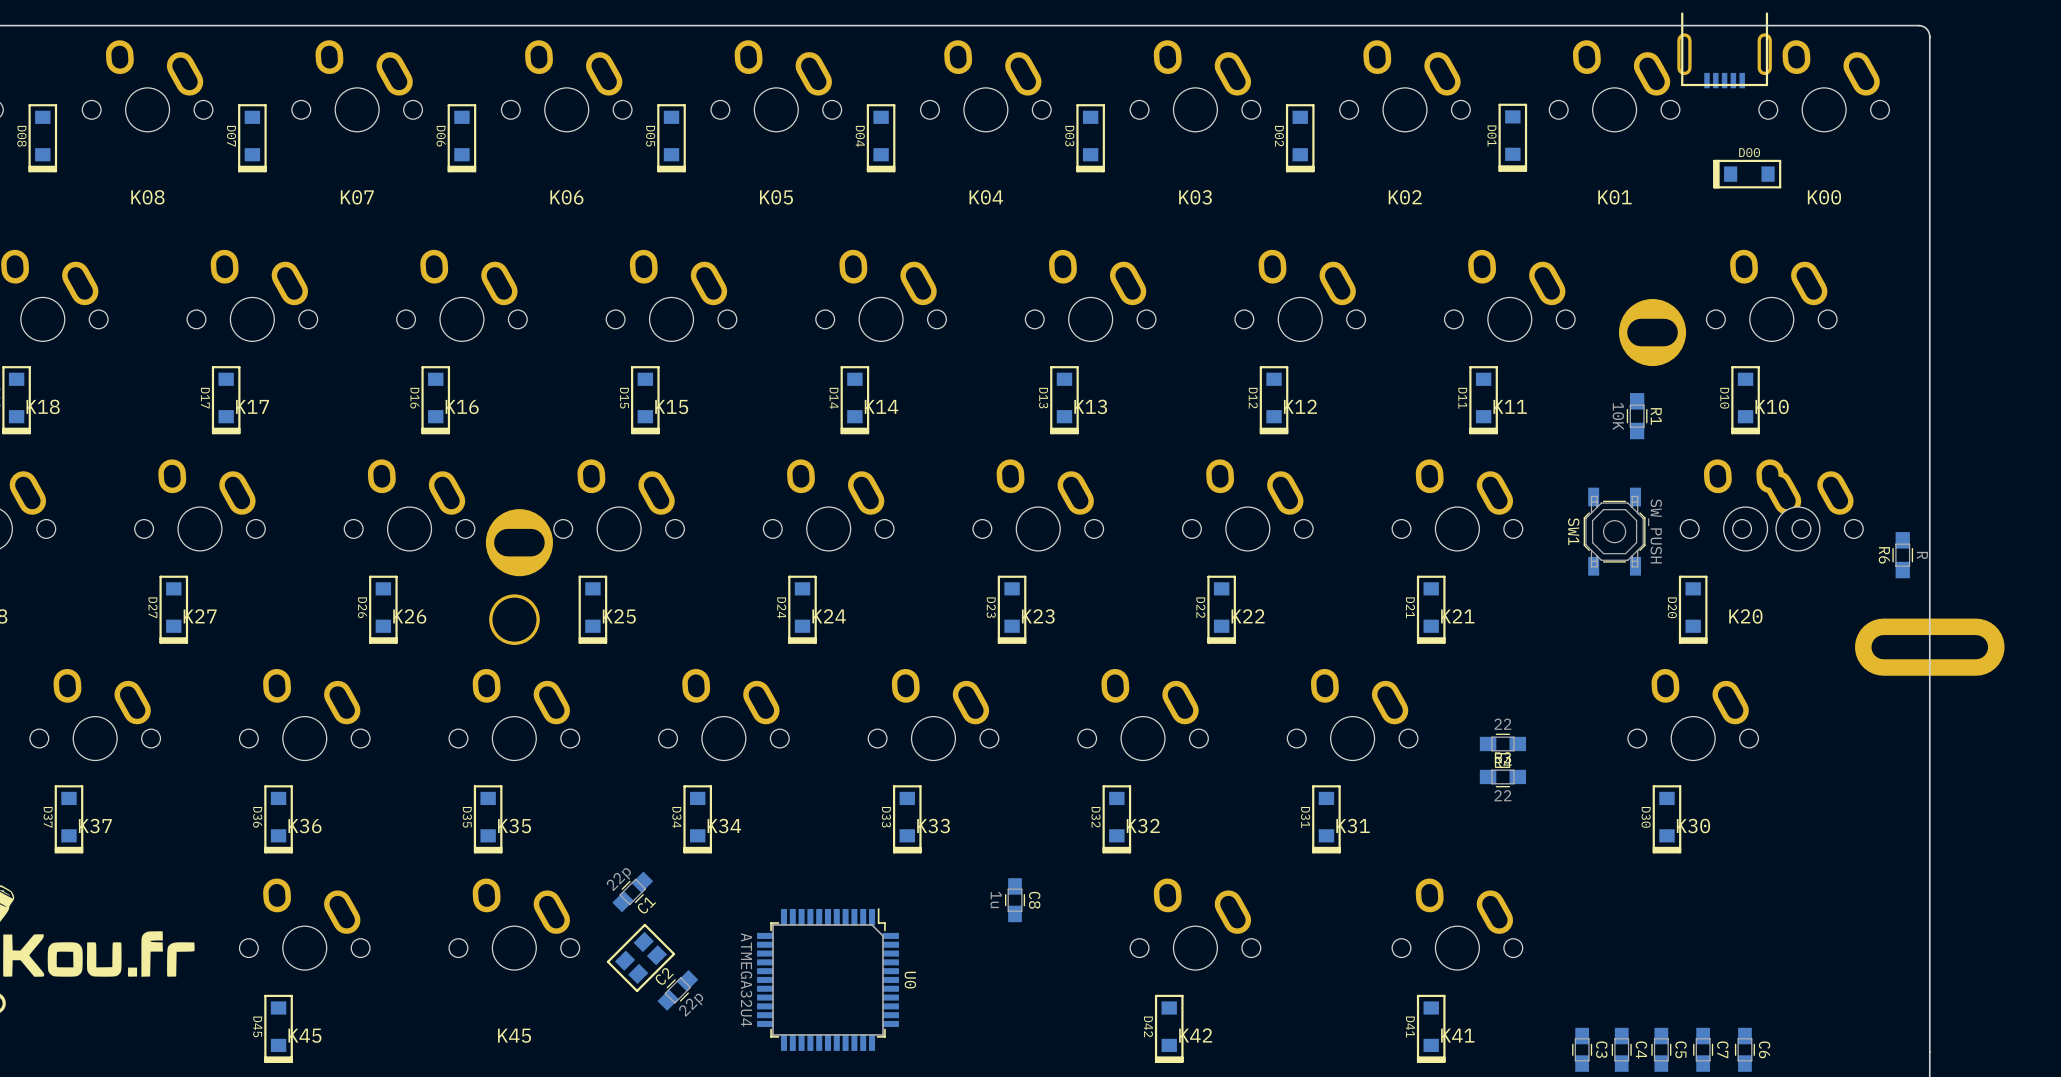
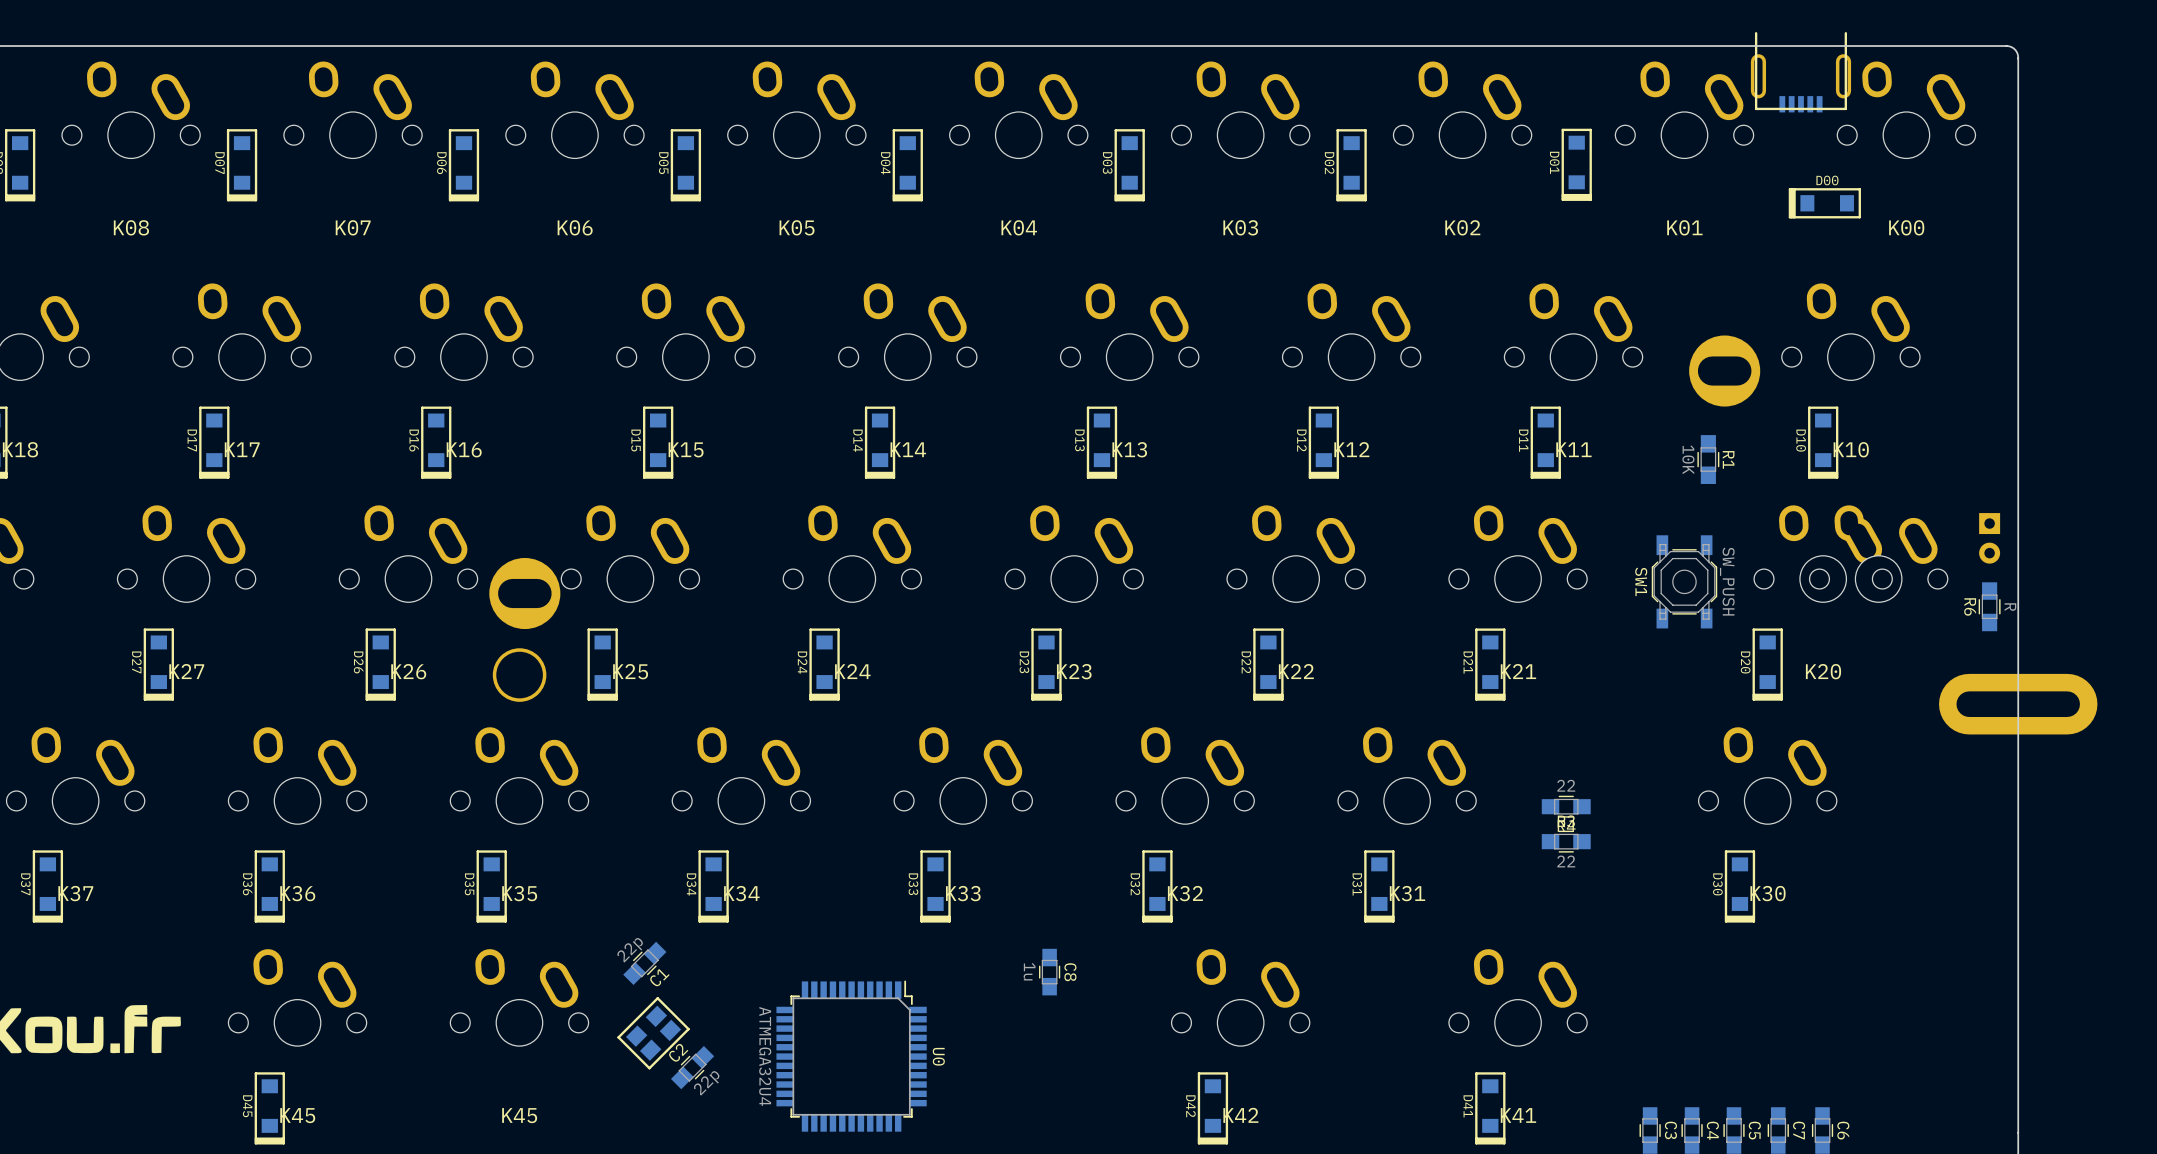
part: none -> (1989, 538)

